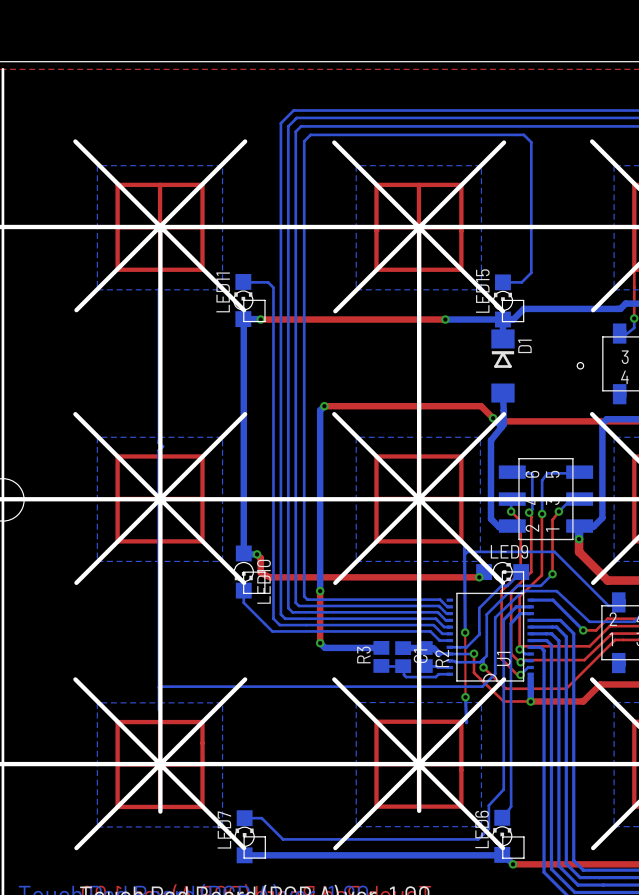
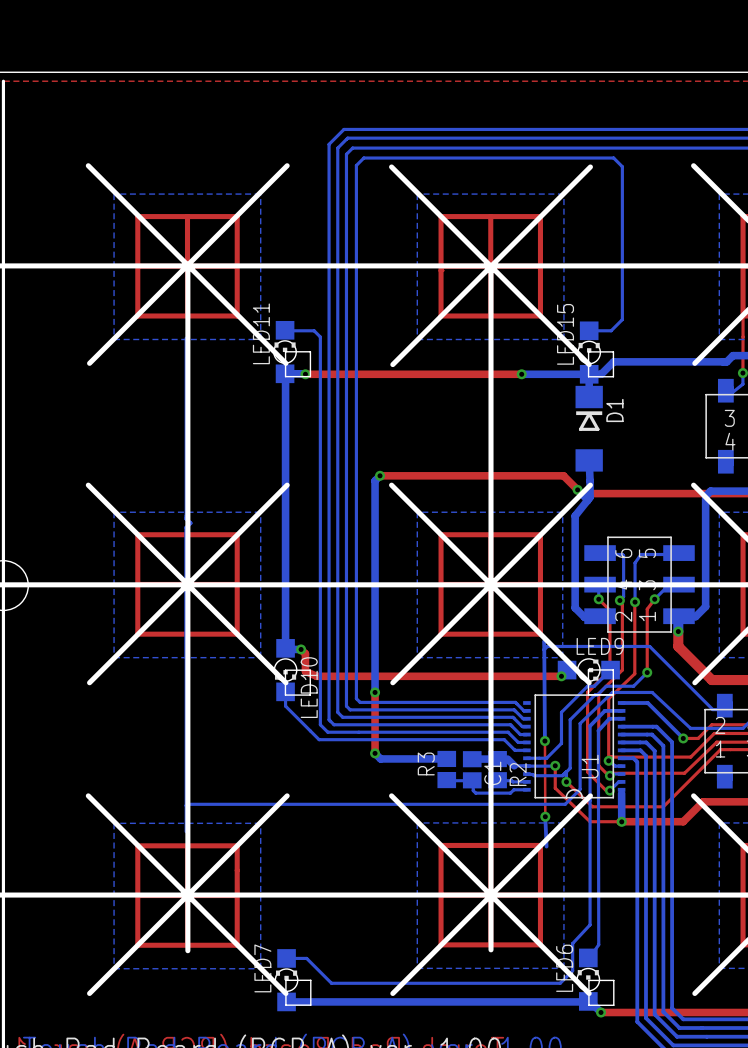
hole: (580, 365) -> none

